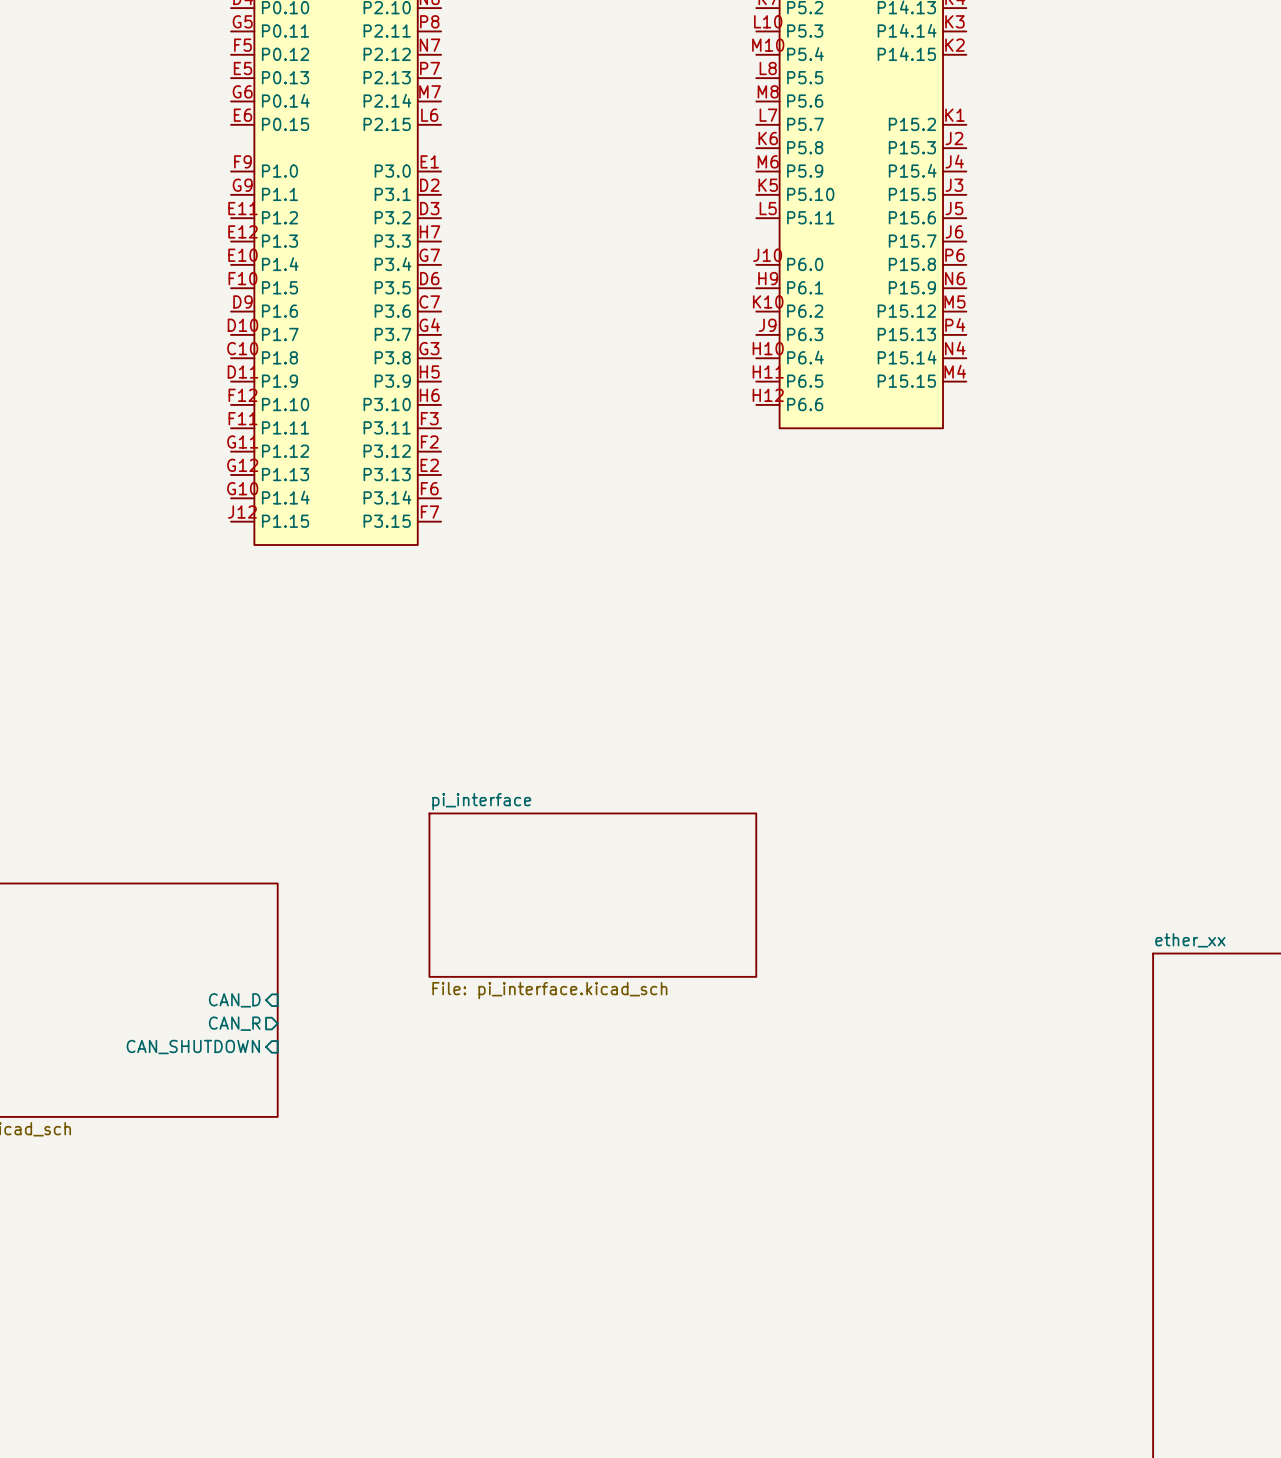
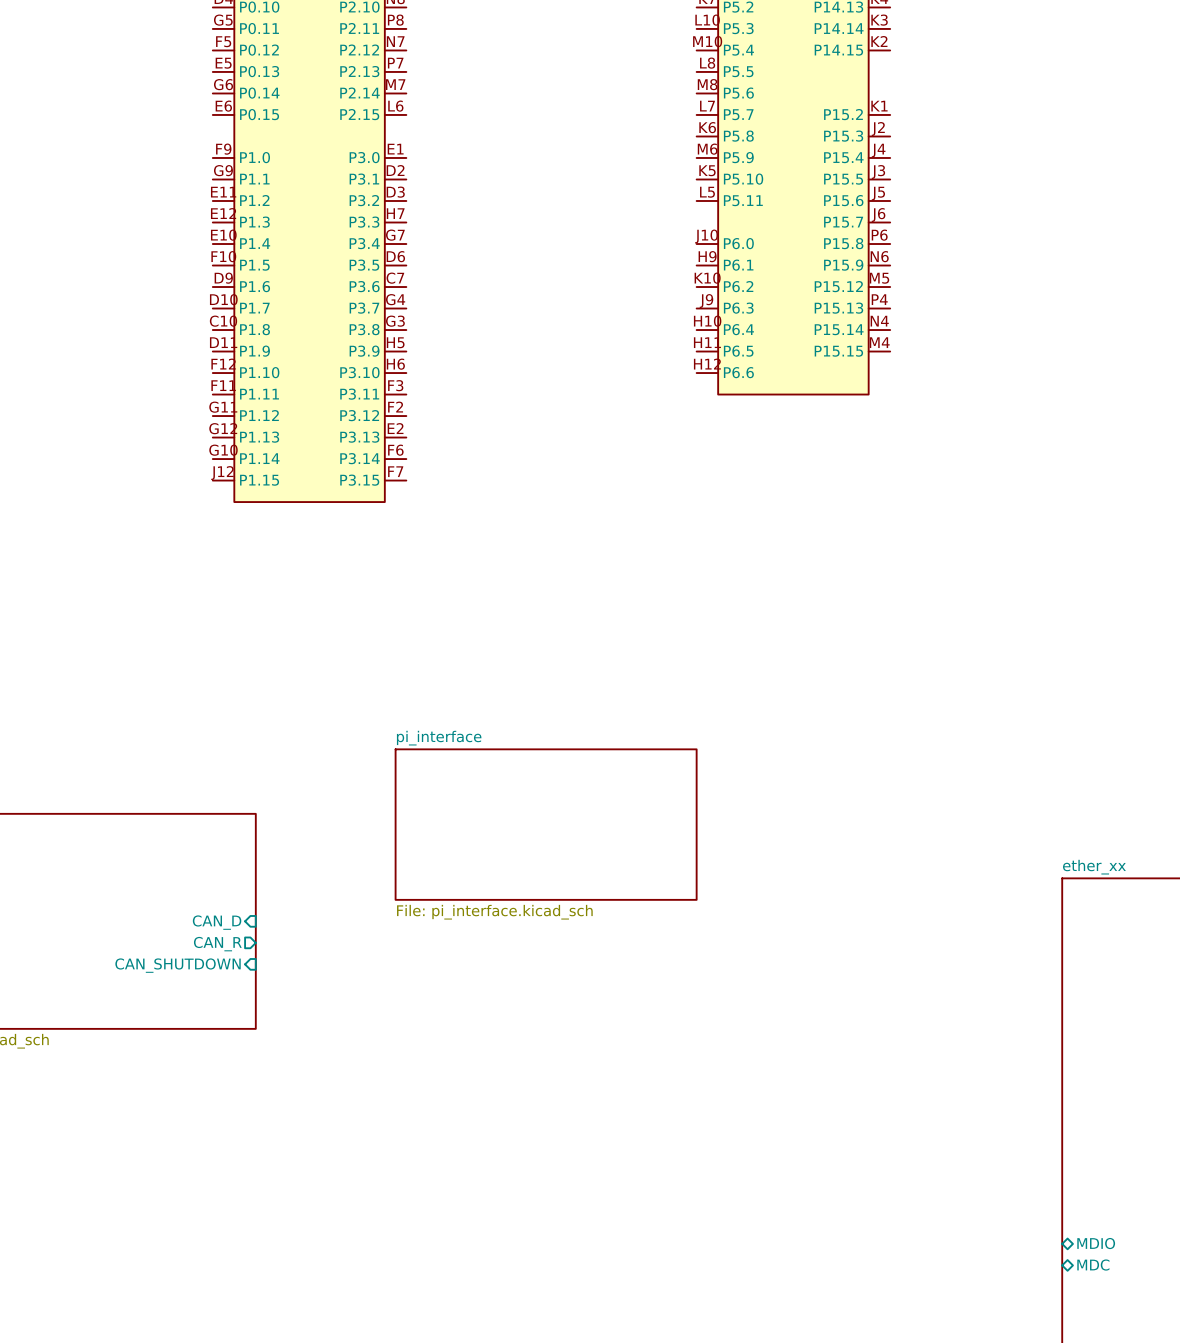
sheet pin: none -> MDIO (1096, 1243)
sheet pin: none -> MDC (1093, 1265)

